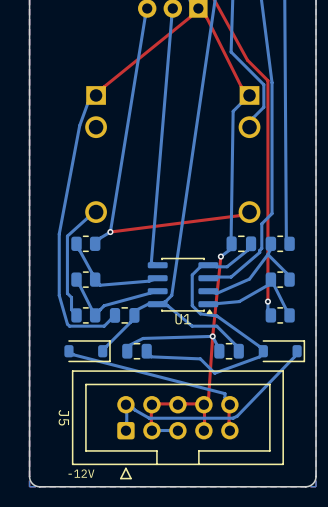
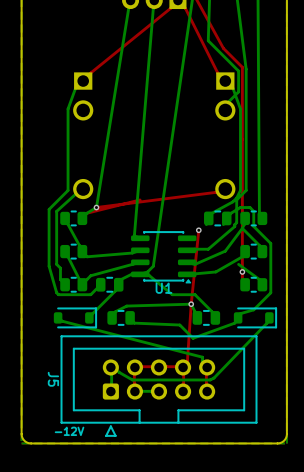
bottom track: (249, 95) (233, 111) (231, 243) -> (225, 81) (232, 88) (240, 108) (240, 190) (232, 201) (212, 213) (208, 218)
bottom track: (79, 125) (59, 234) -> (68, 108) (68, 190) (49, 209)
top track: none -> (140, 199) (87, 213)
bottom track: (229, 250) (220, 256) -> none
bottom track: (247, 250) (227, 266) (208, 265) (200, 266) (192, 275) (192, 305) (200, 313) (216, 315) (259, 346) (263, 351) -> (226, 218) (240, 207) (249, 207) (253, 211) (253, 226) (270, 243) (270, 292) (253, 309) (240, 313) (238, 317)
bottom track: (270, 279) (286, 309) -> (238, 264) (259, 279)
bottom track: (267, 301) (267, 309) -> none
top track: none -> (242, 271) (242, 279)

